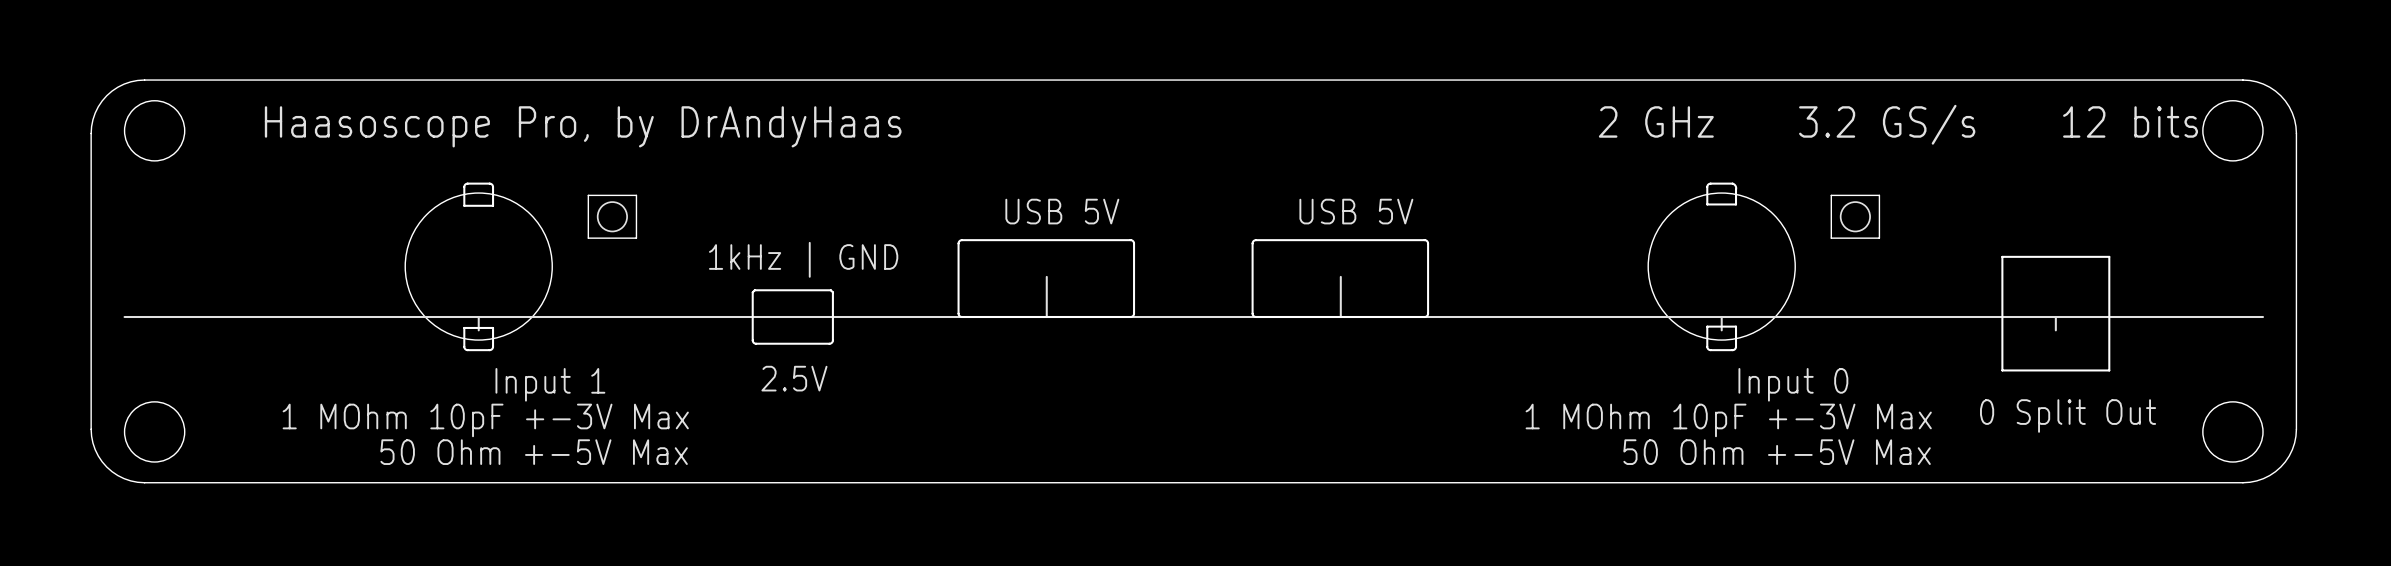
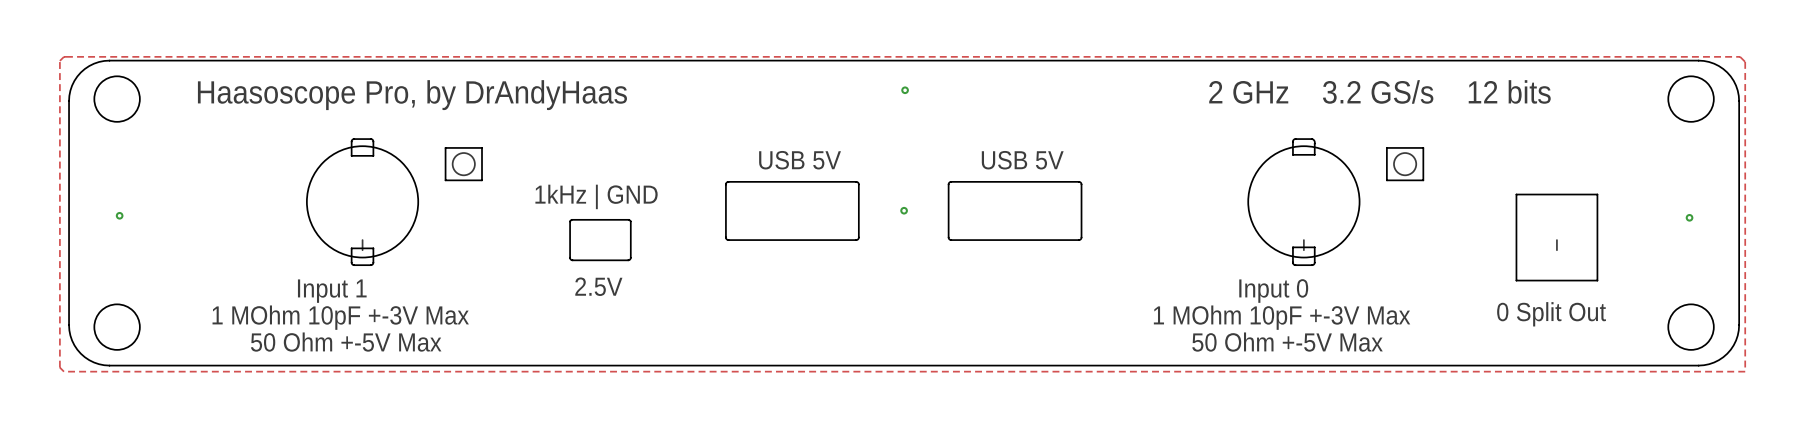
zone outline: none -> (63, 56) (1740, 56) (1745, 61) (1745, 371) (63, 371) (59, 367) (59, 60) (63, 56)
via: none -> (905, 90)
line: (1046, 276) (1046, 317) -> none
line: (1340, 276) (1340, 317) -> none
via: none -> (904, 210)
via: none -> (119, 215)
via: none -> (1689, 217)
line: (124, 317) (2263, 317) -> none

